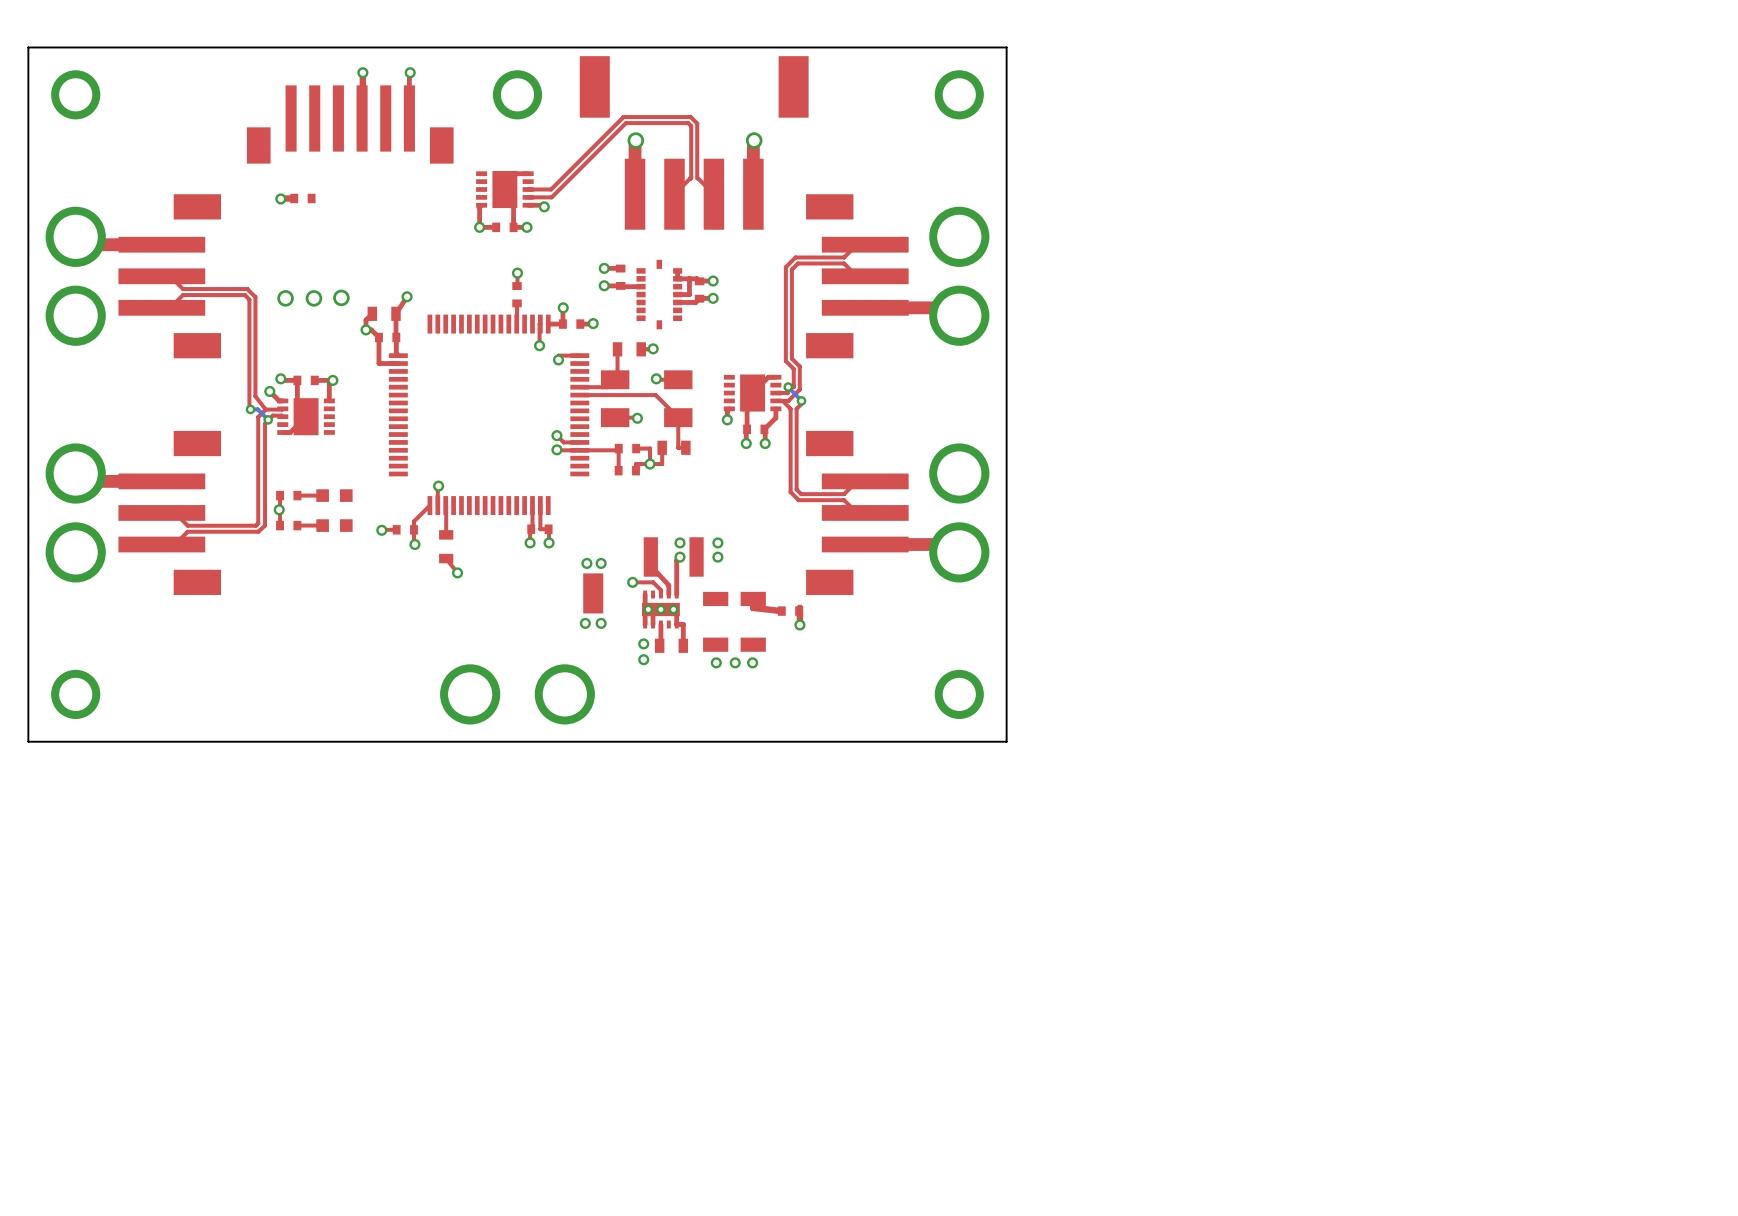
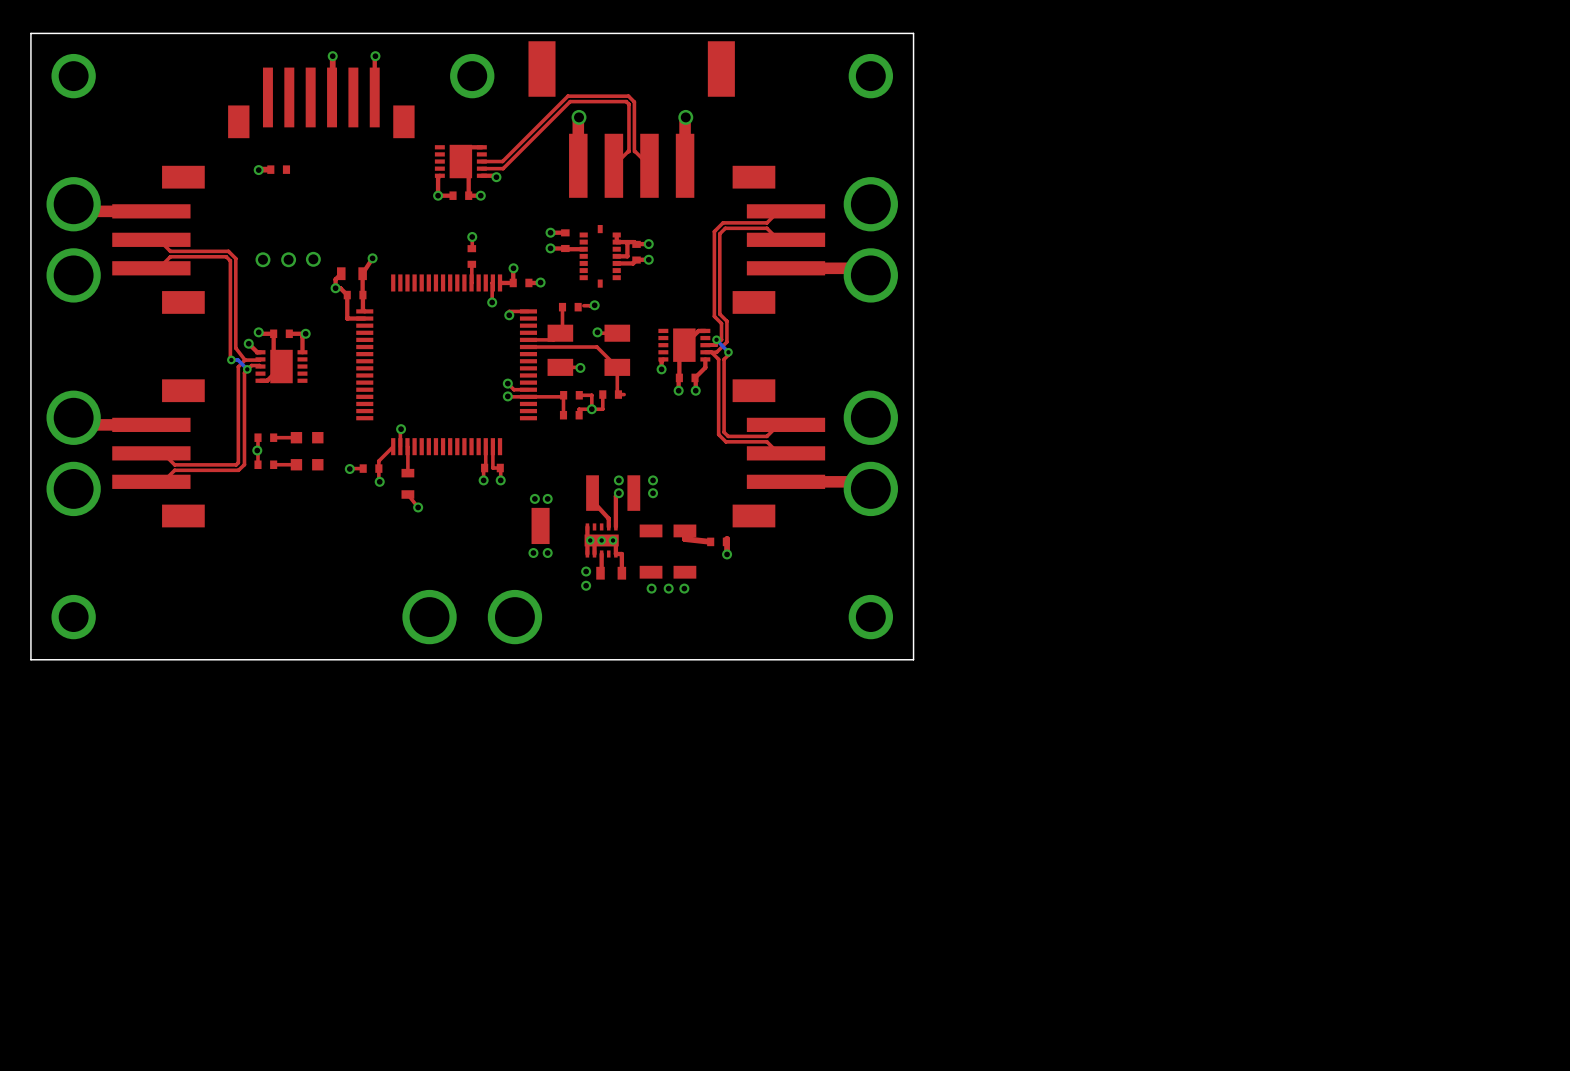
part footprint: [612, 342, 646, 357] -> [558, 302, 582, 312]
part footprint: [657, 440, 691, 455] -> [599, 390, 623, 399]
top track: (632, 582) (653, 582) (660, 590) (660, 594) -> none
via: (632, 582) -> none

